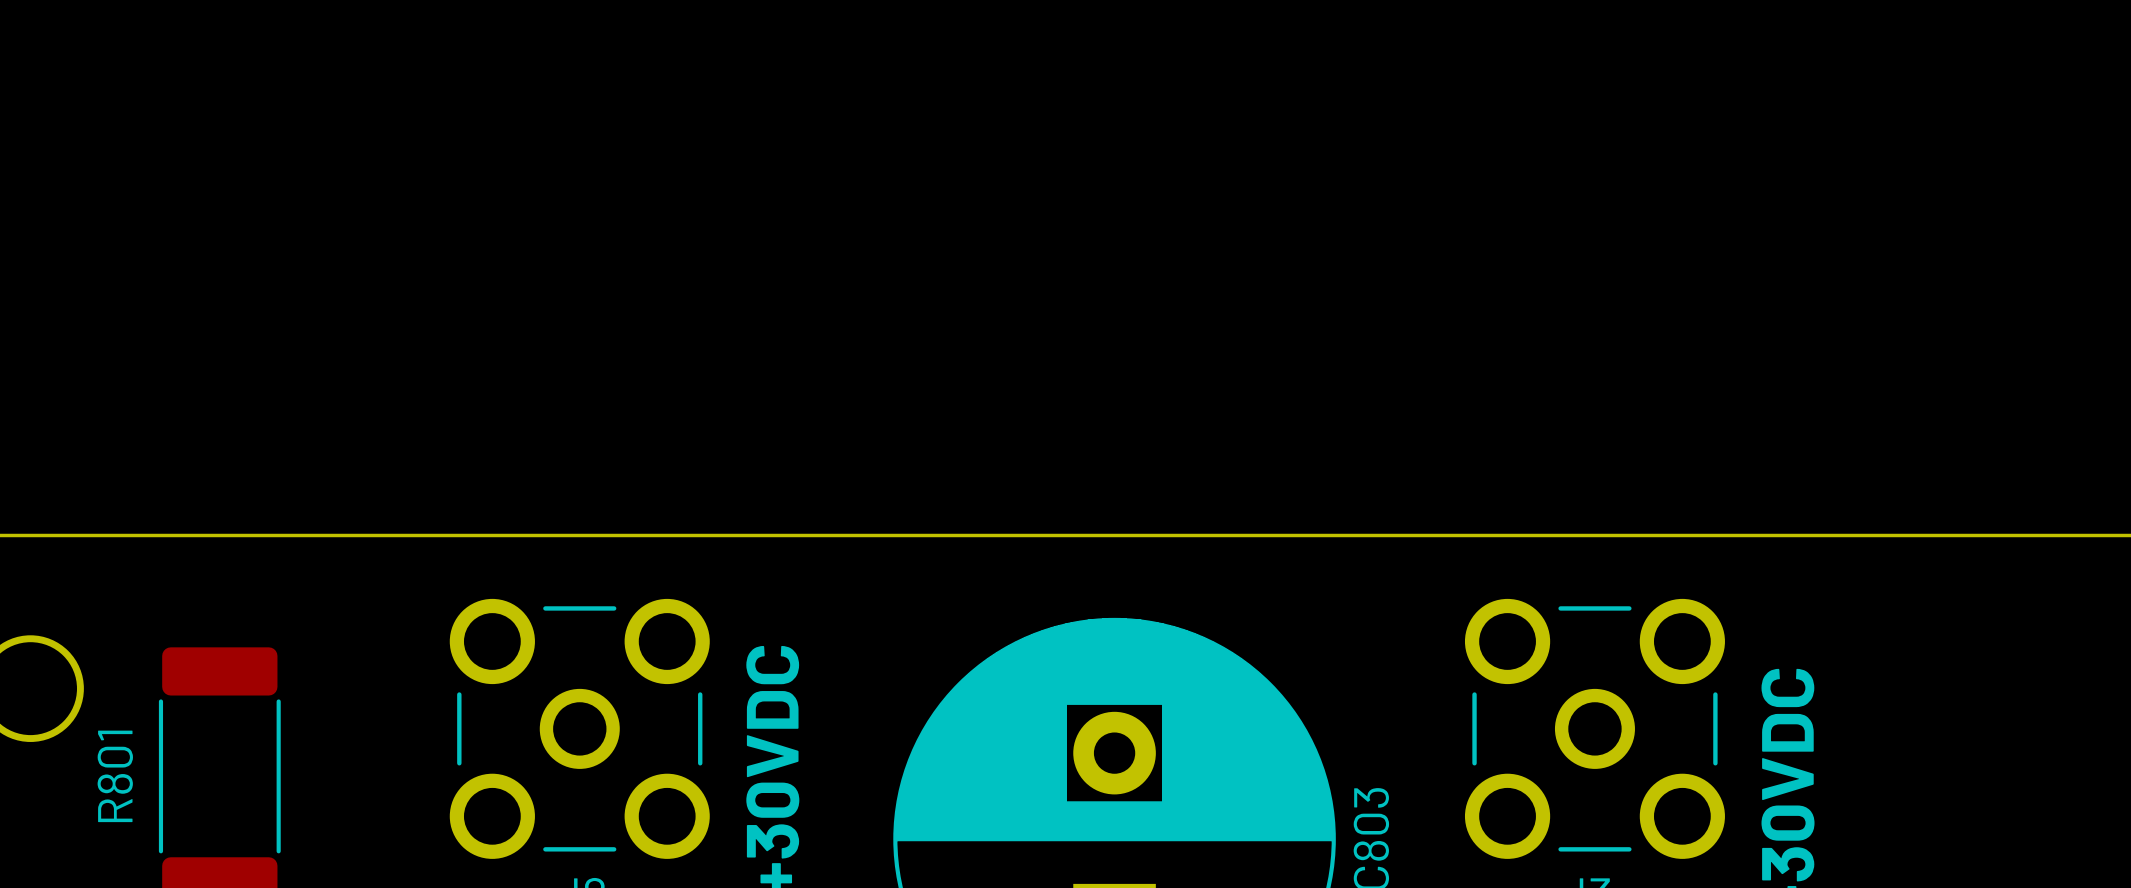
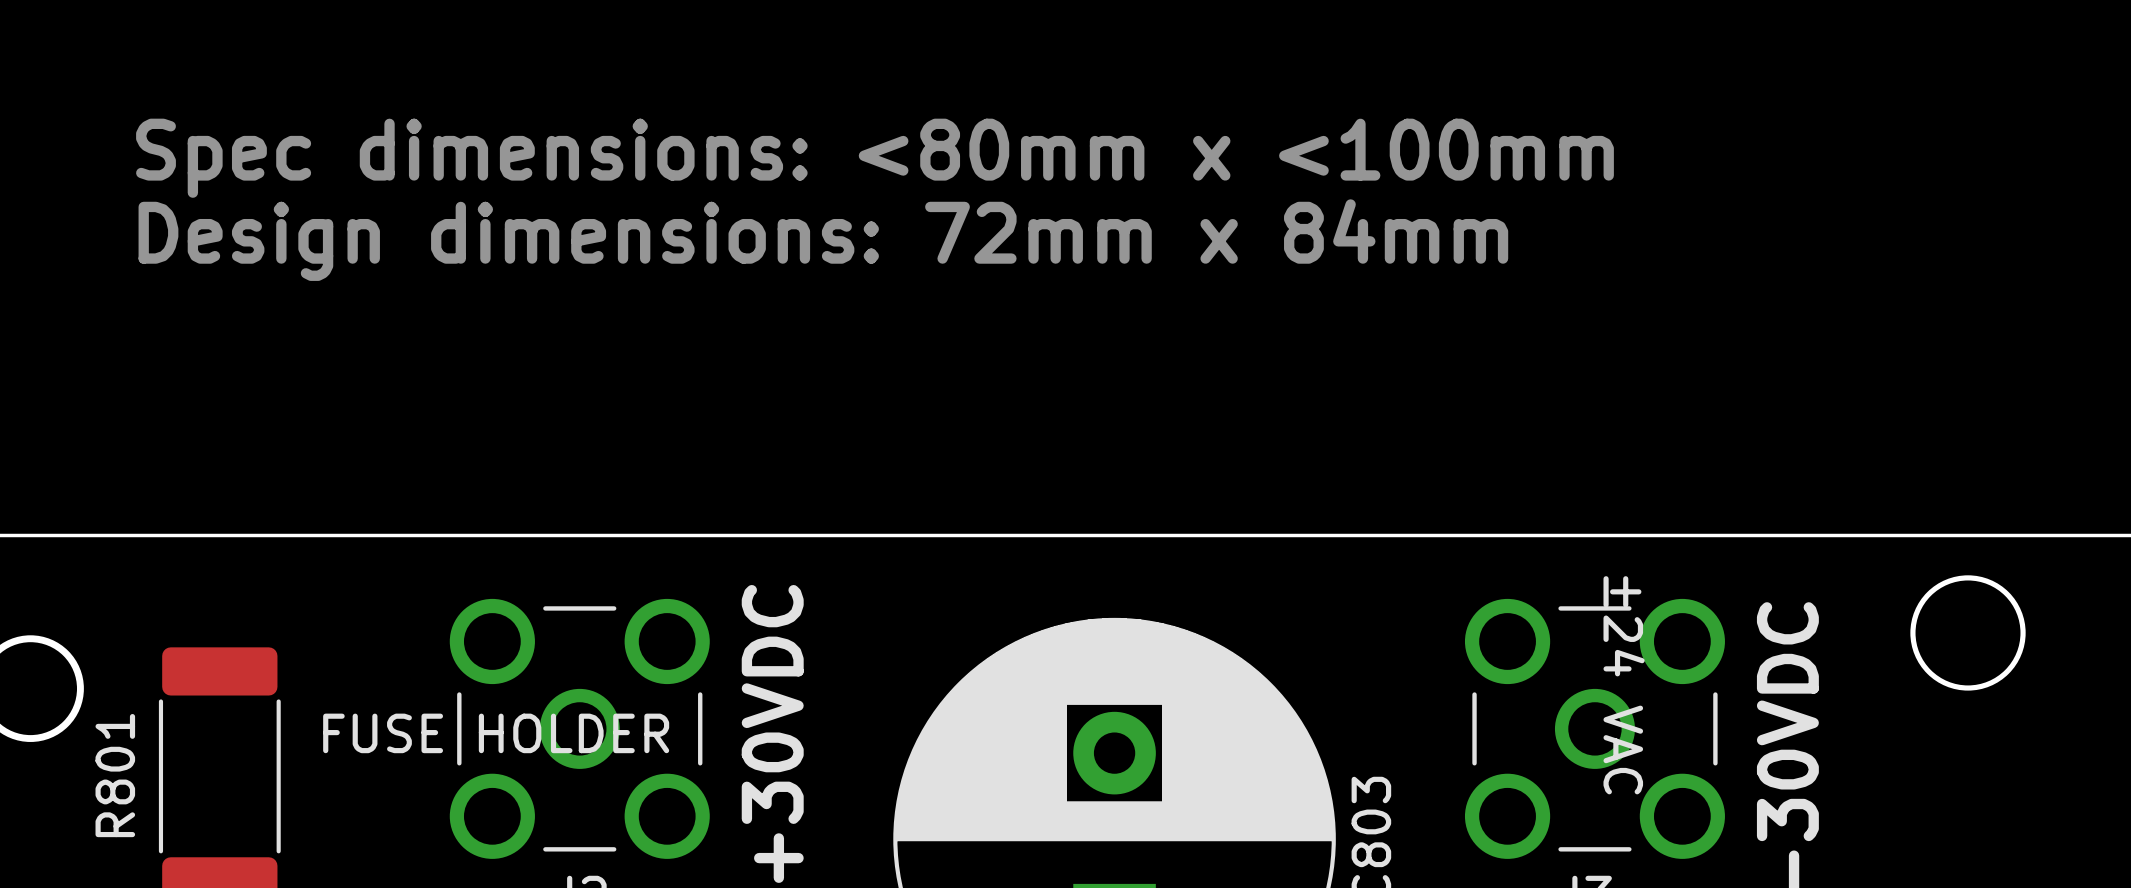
text: none -> Spec dimensions: <80mm x <100mm (874, 158)
text: none -> Design dimensions: 72mm x 84mm (823, 240)
round board edge: none -> [1910, 575, 2026, 691]
text: none -> ±24 VAC (1624, 685)
text: none -> FUSE HOLDER (496, 733)

